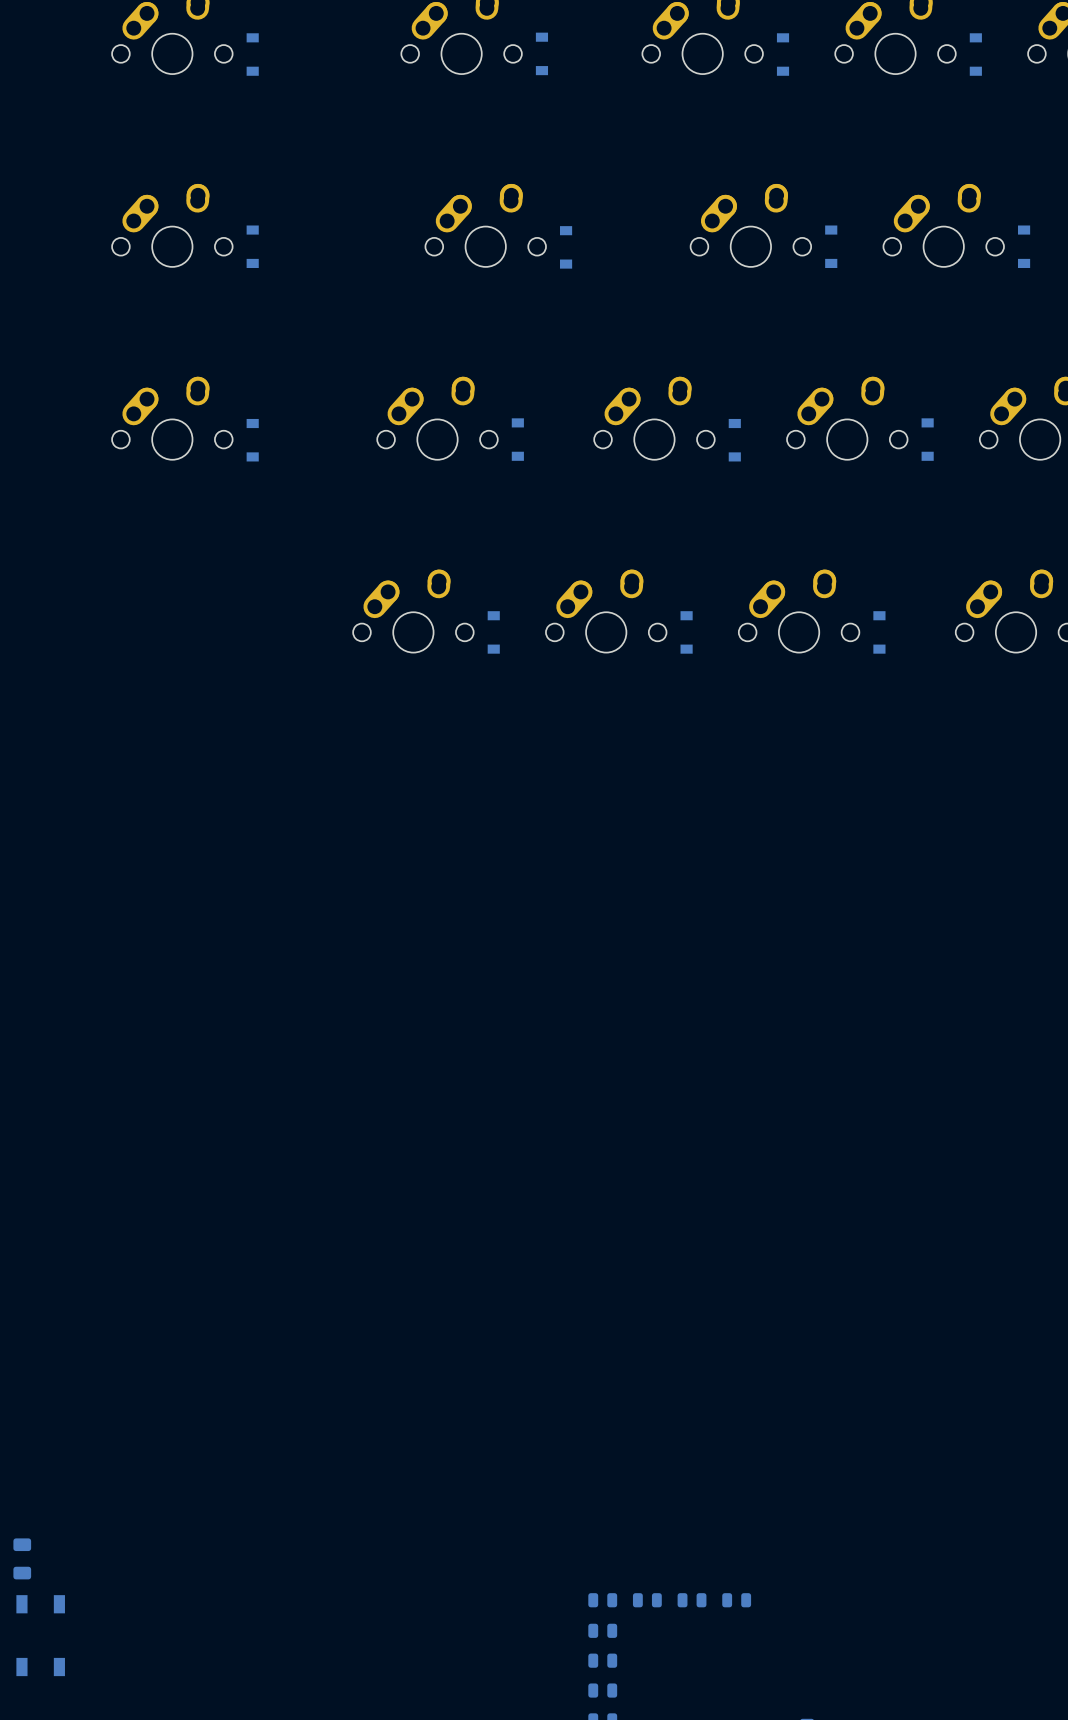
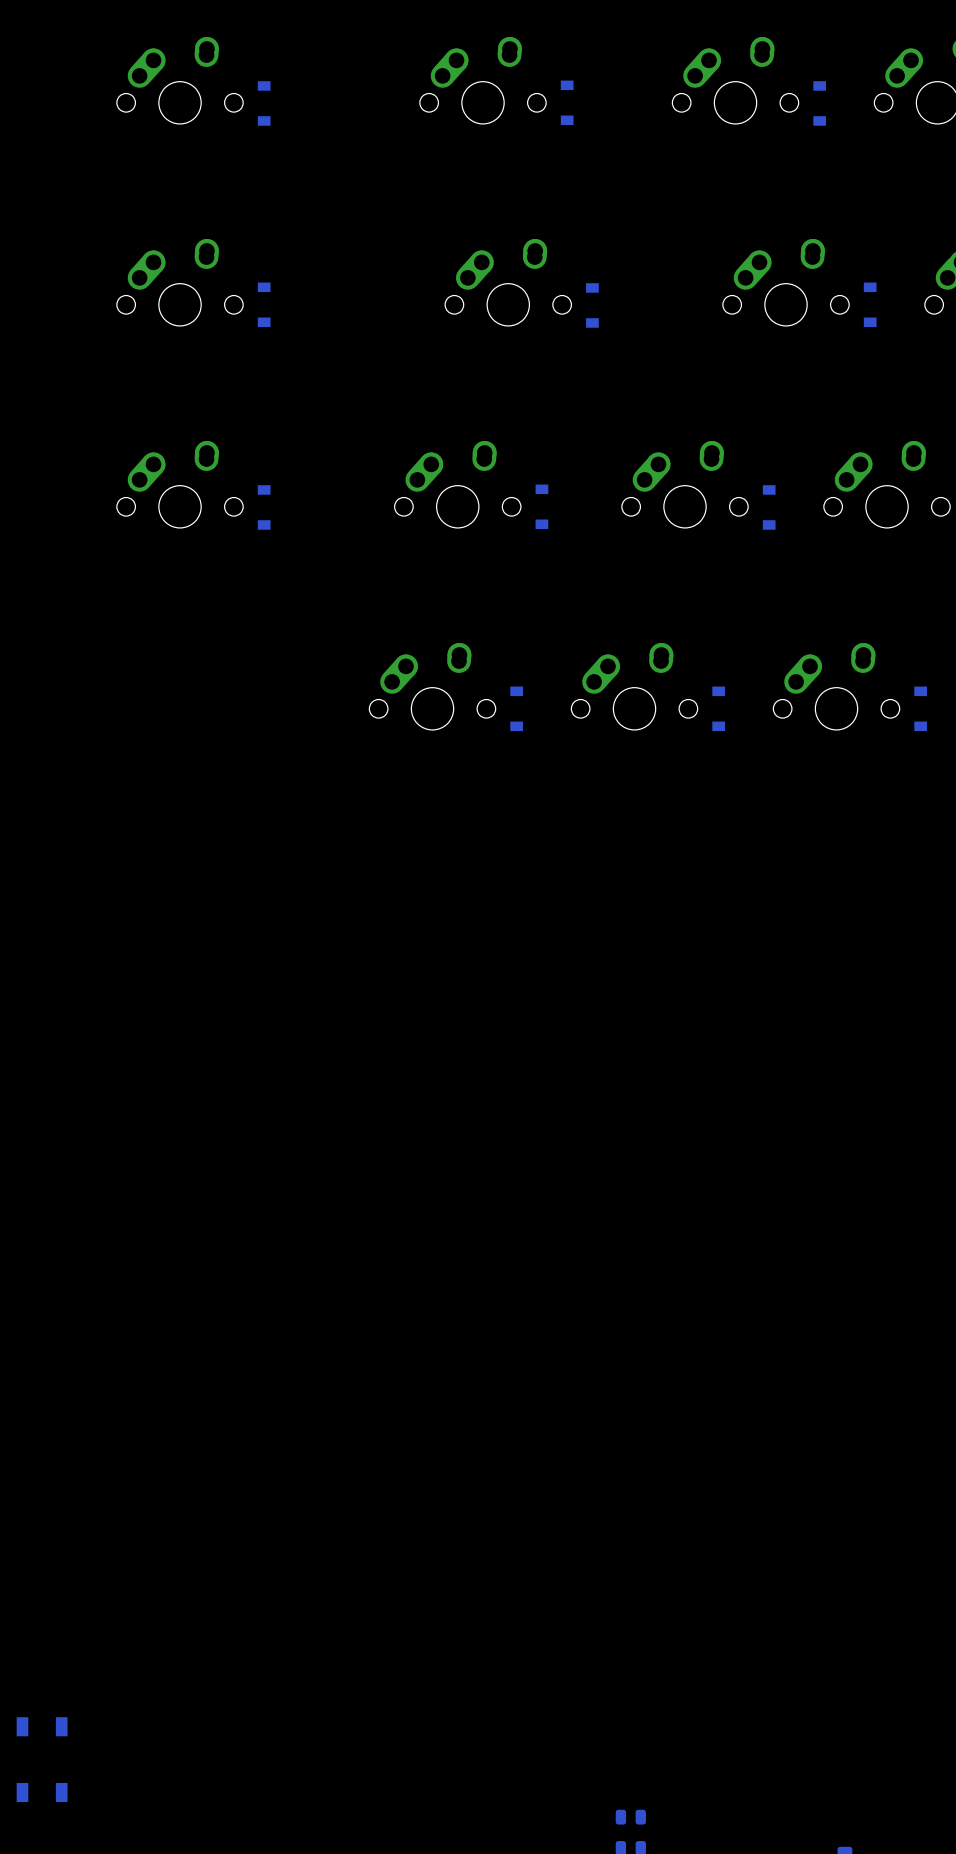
part: (22, 1558) -> none
part: (602, 1600) -> none
part: (647, 1600) -> none
part: (692, 1600) -> none
part: (736, 1600) -> none
part: (602, 1630) -> none
part: (602, 1660) -> none

